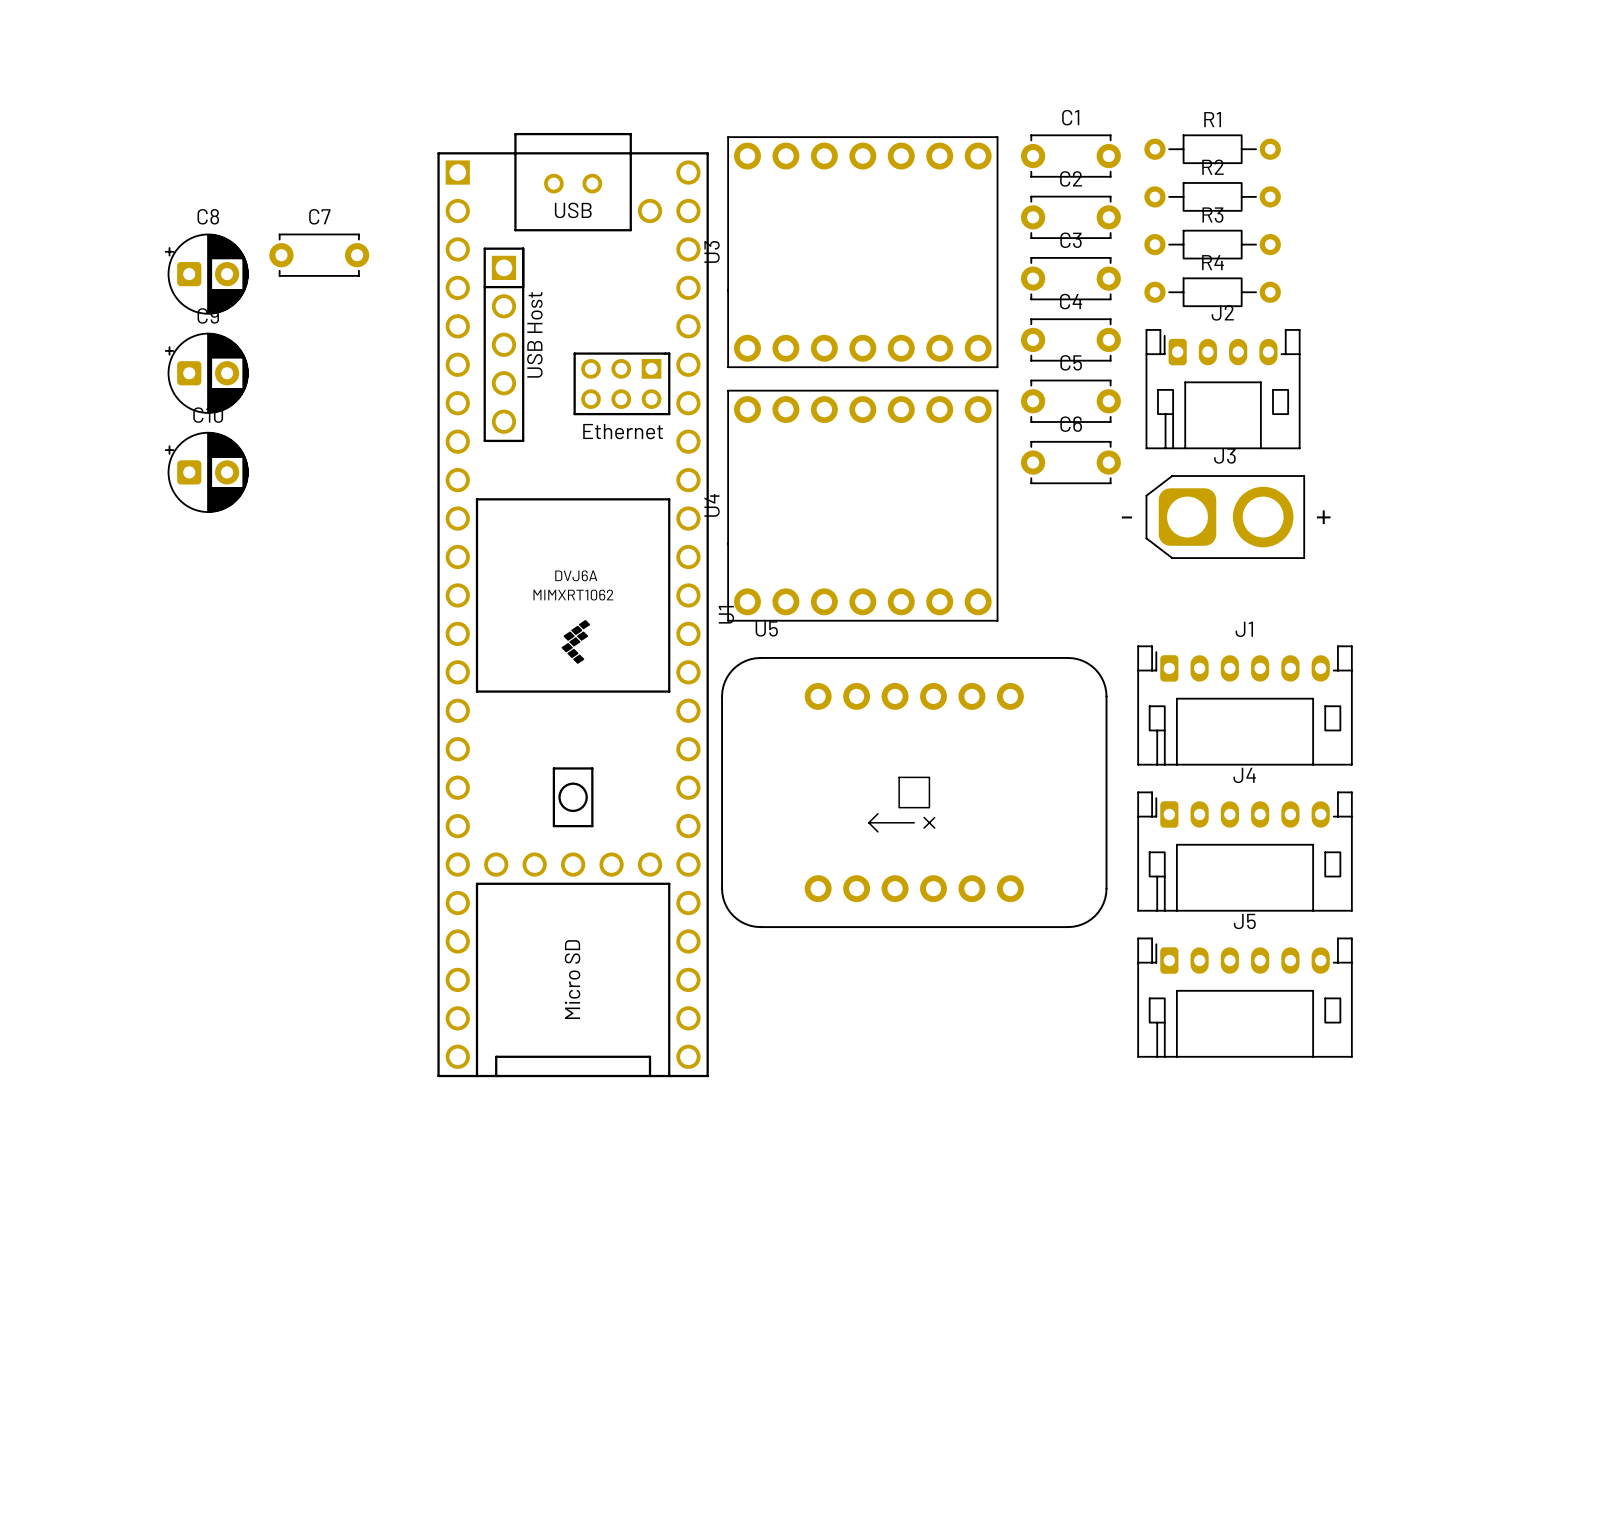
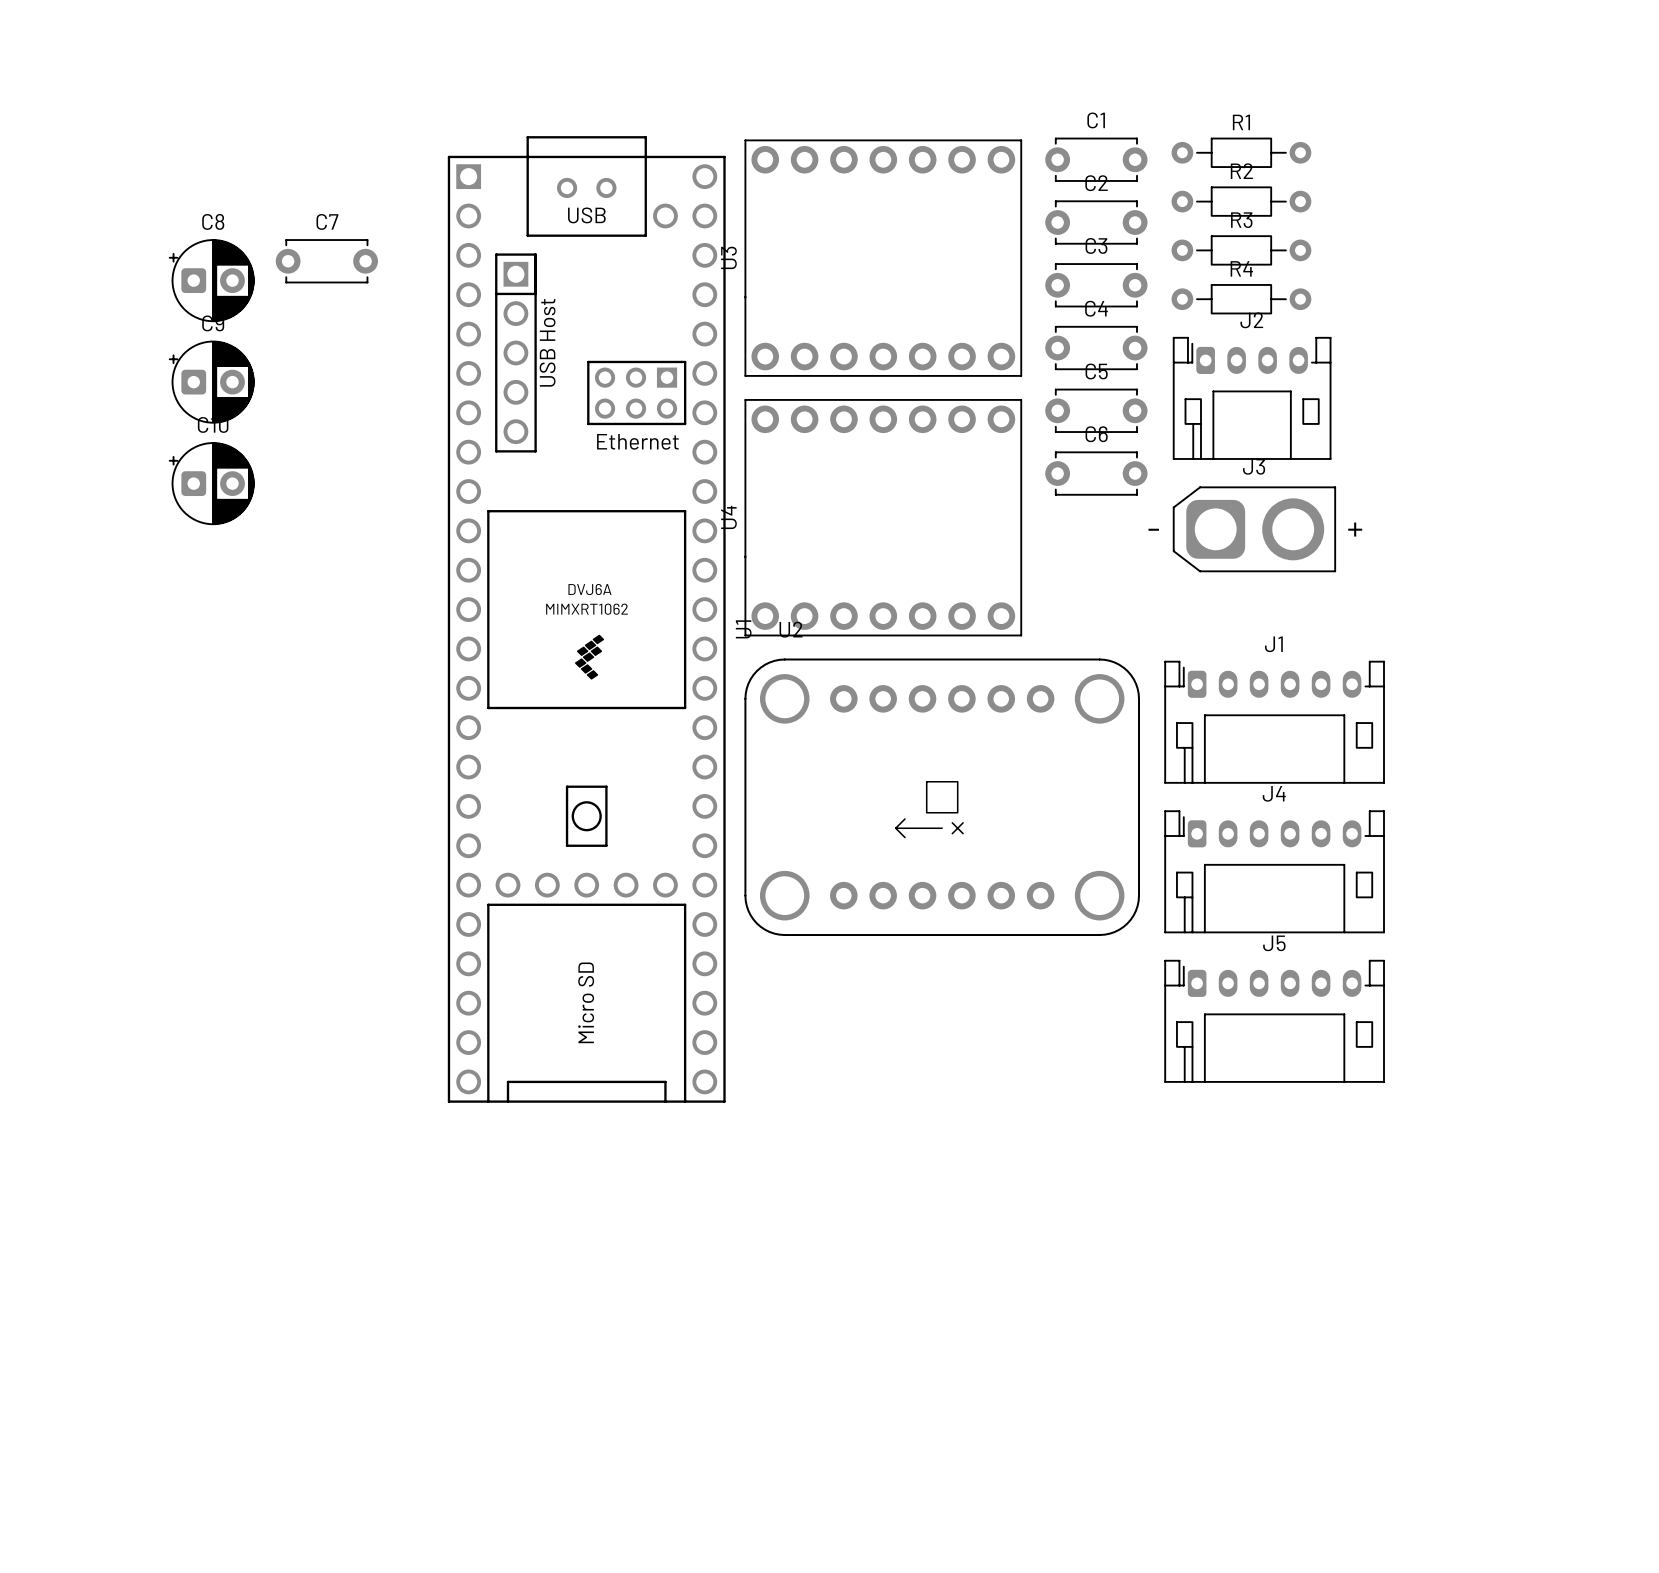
U2: none -> (942, 797)
U5: (914, 792) -> none

